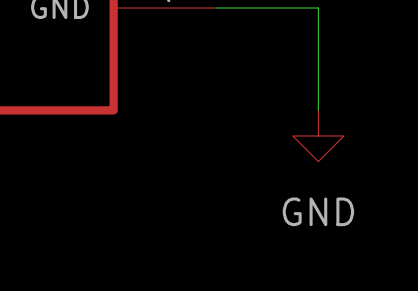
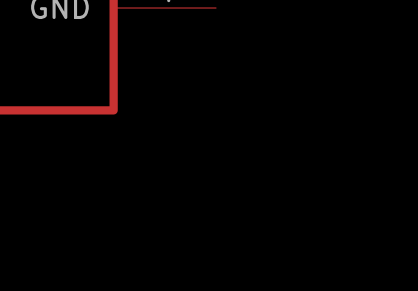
wire: (216, 8) (318, 8) (318, 110) -> none
power symbol: GND (318, 135) -> none

